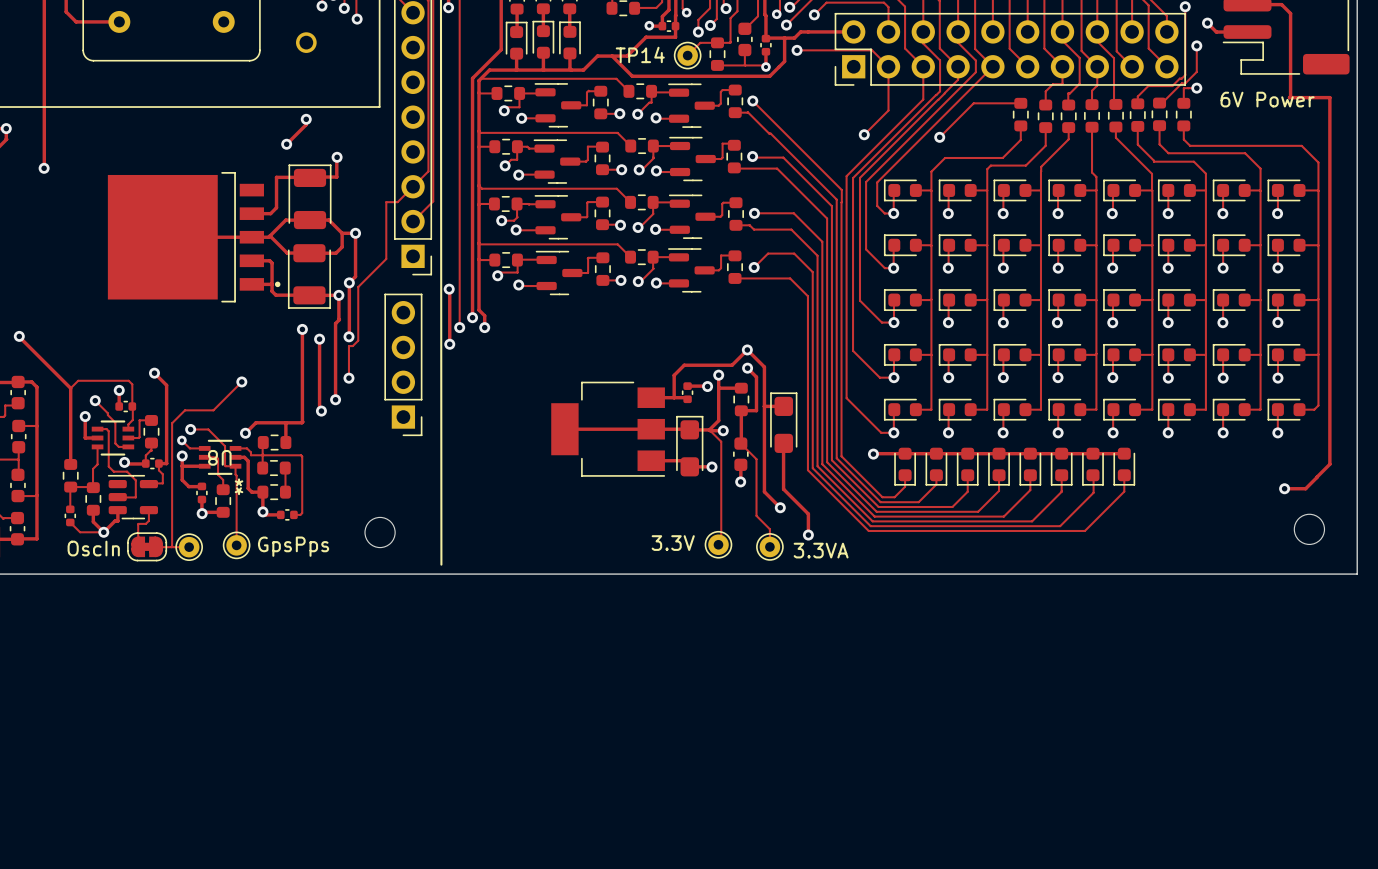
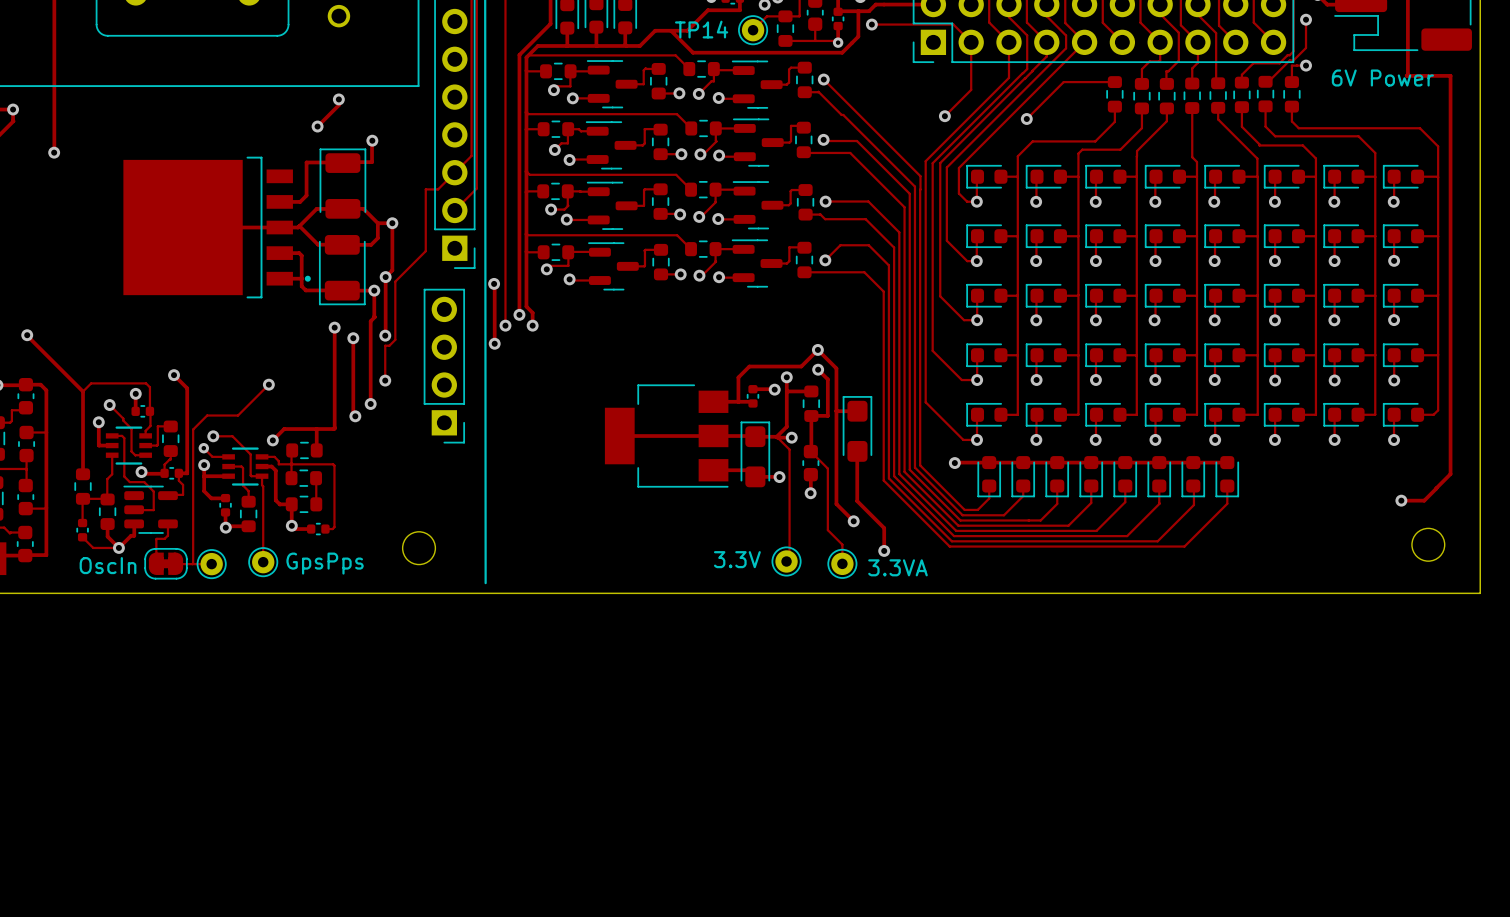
U8 footprint: [198, 439, 242, 475] -> [222, 447, 269, 486]
U8 name: U8 (219, 457) -> none

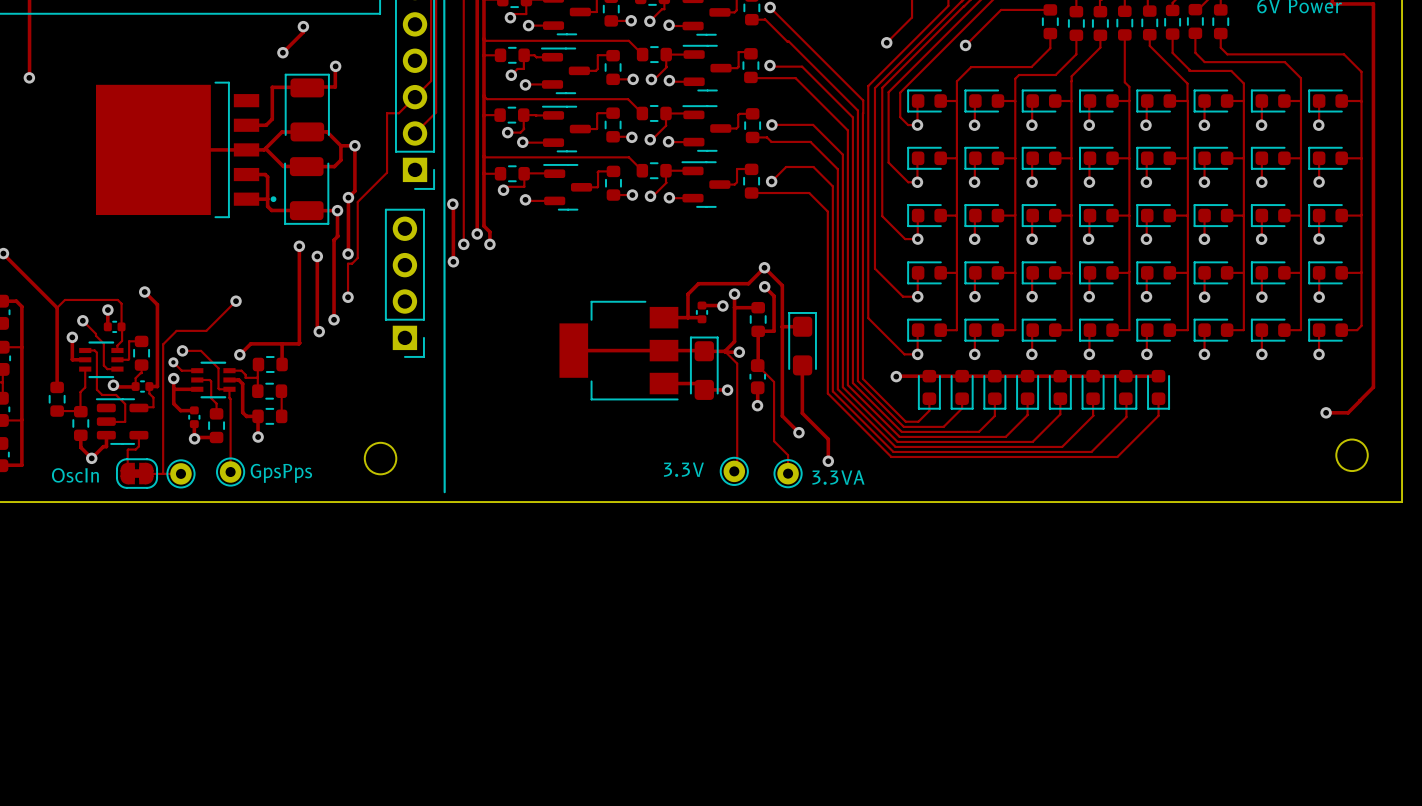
track: (291, 463) (334, 465) (334, 527) (325, 529) -> none
track: (83, 498) (82, 523) -> none
track: (291, 525) (295, 529) (311, 529) -> none
part: (318, 529) -> none
part: (82, 530) -> none
track: (82, 537) (93, 547) (118, 547) -> none

